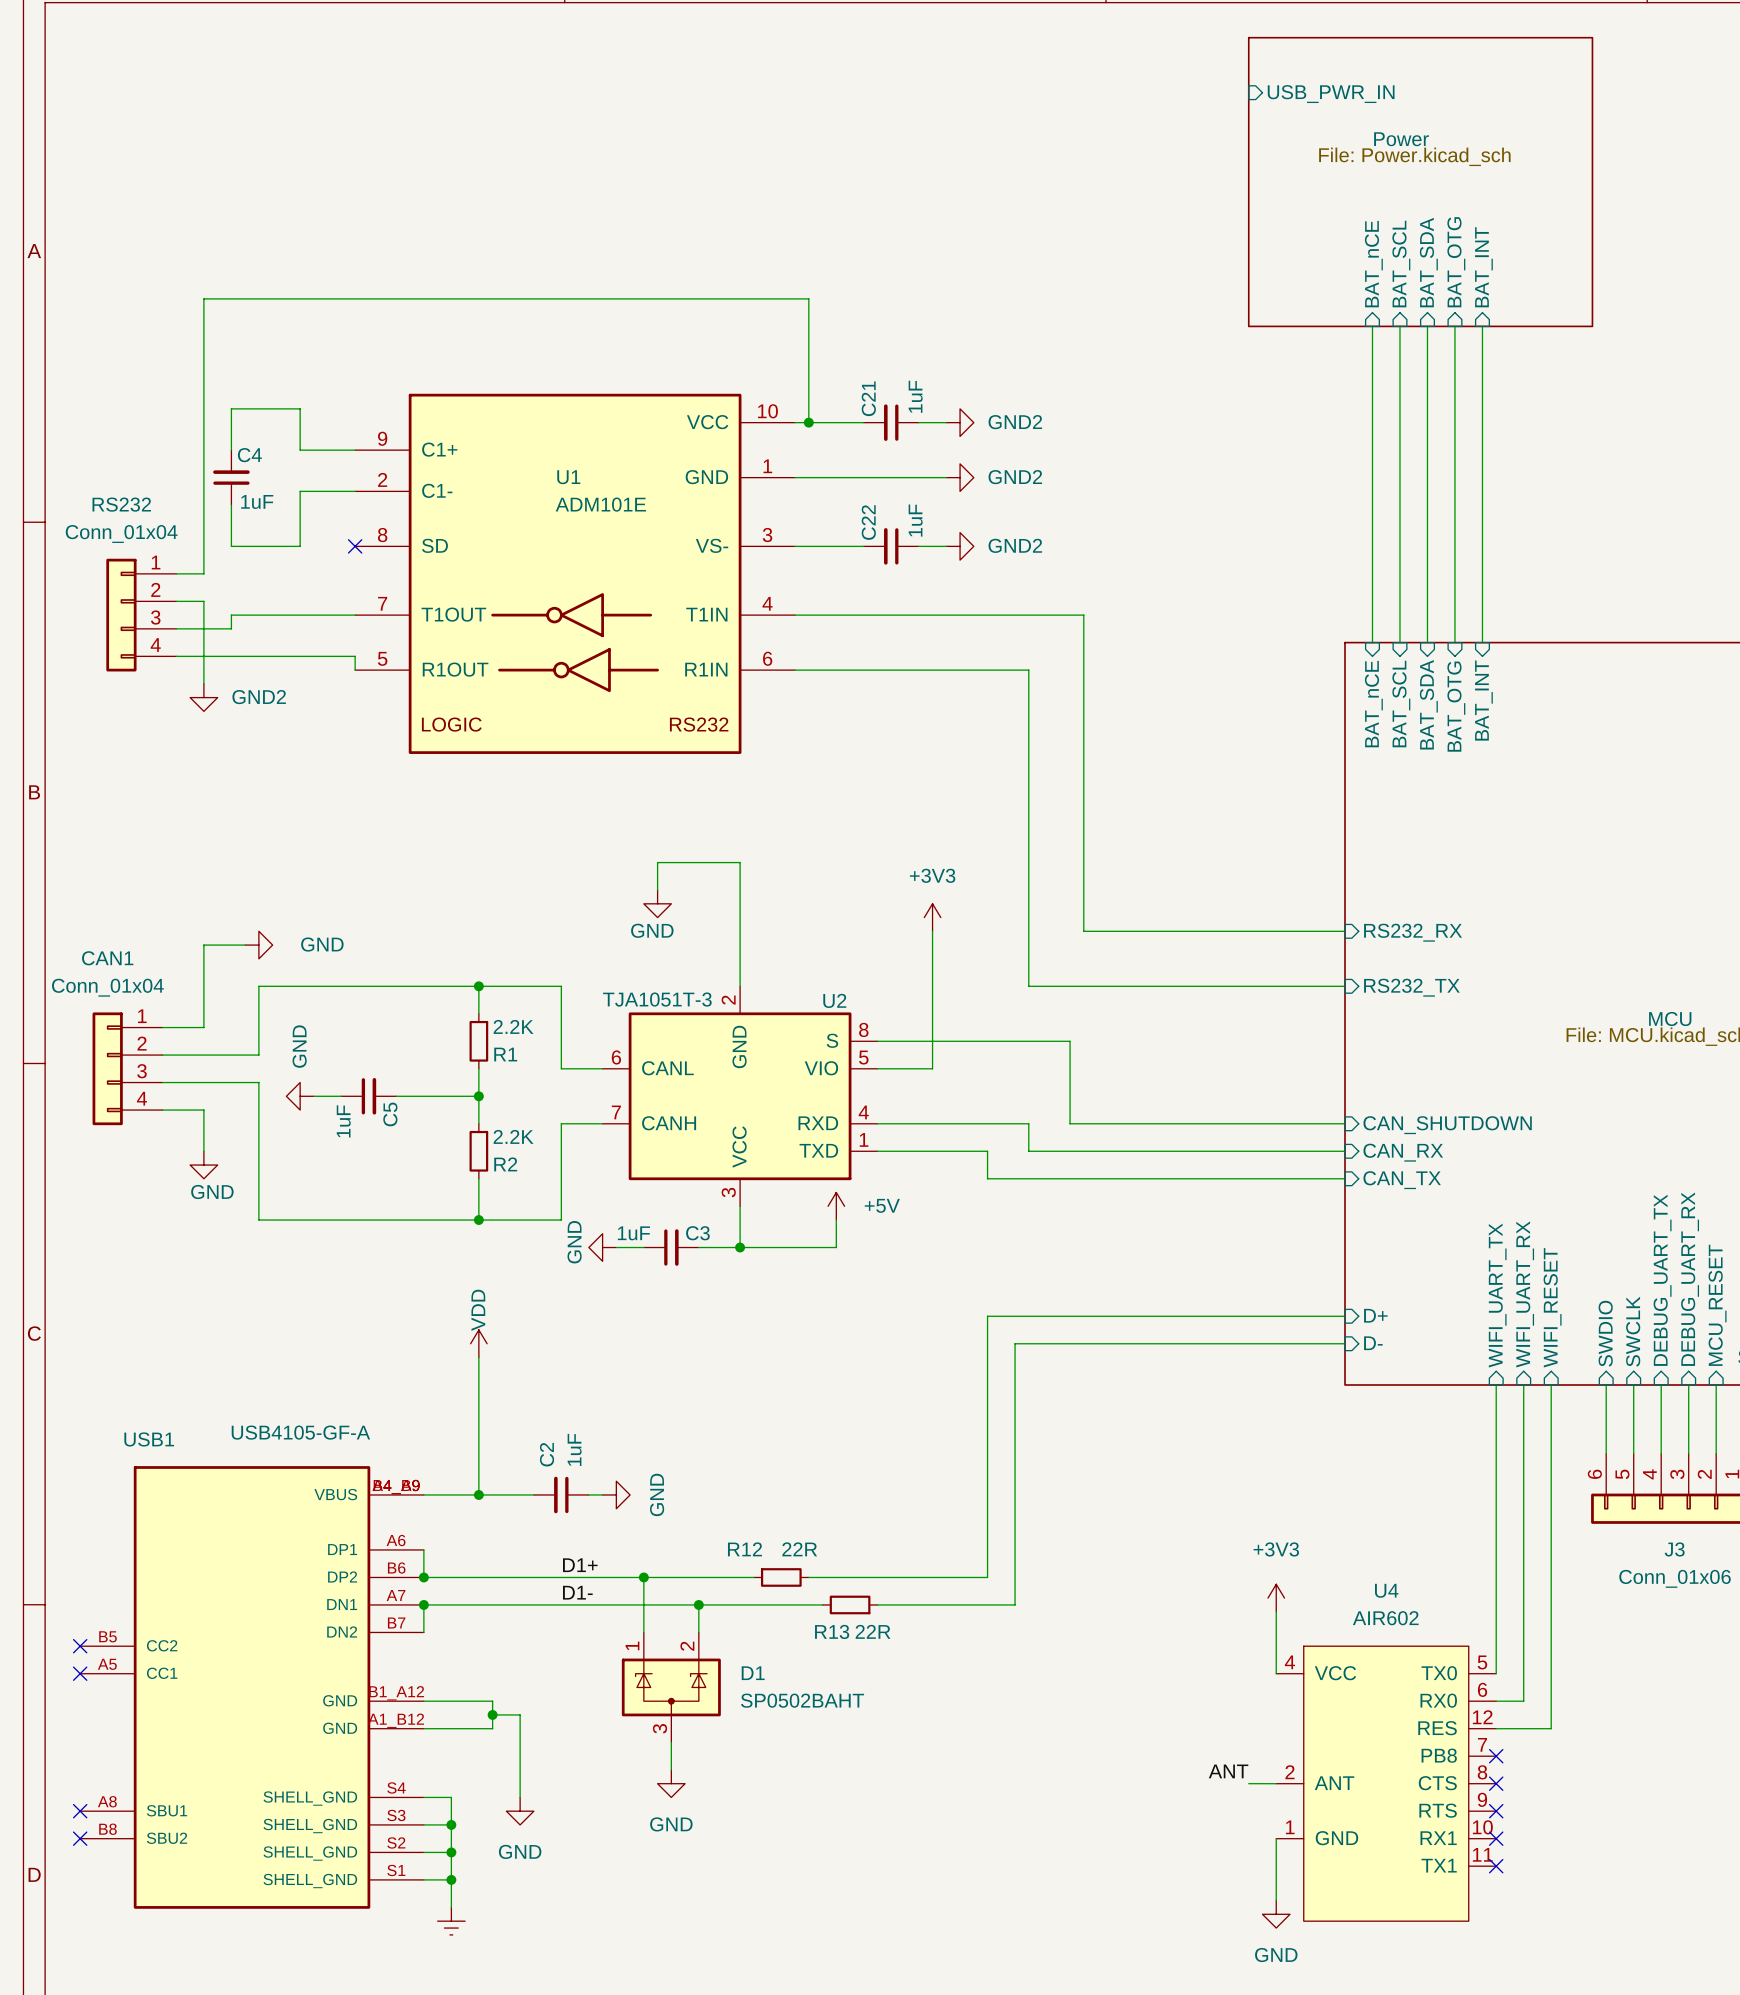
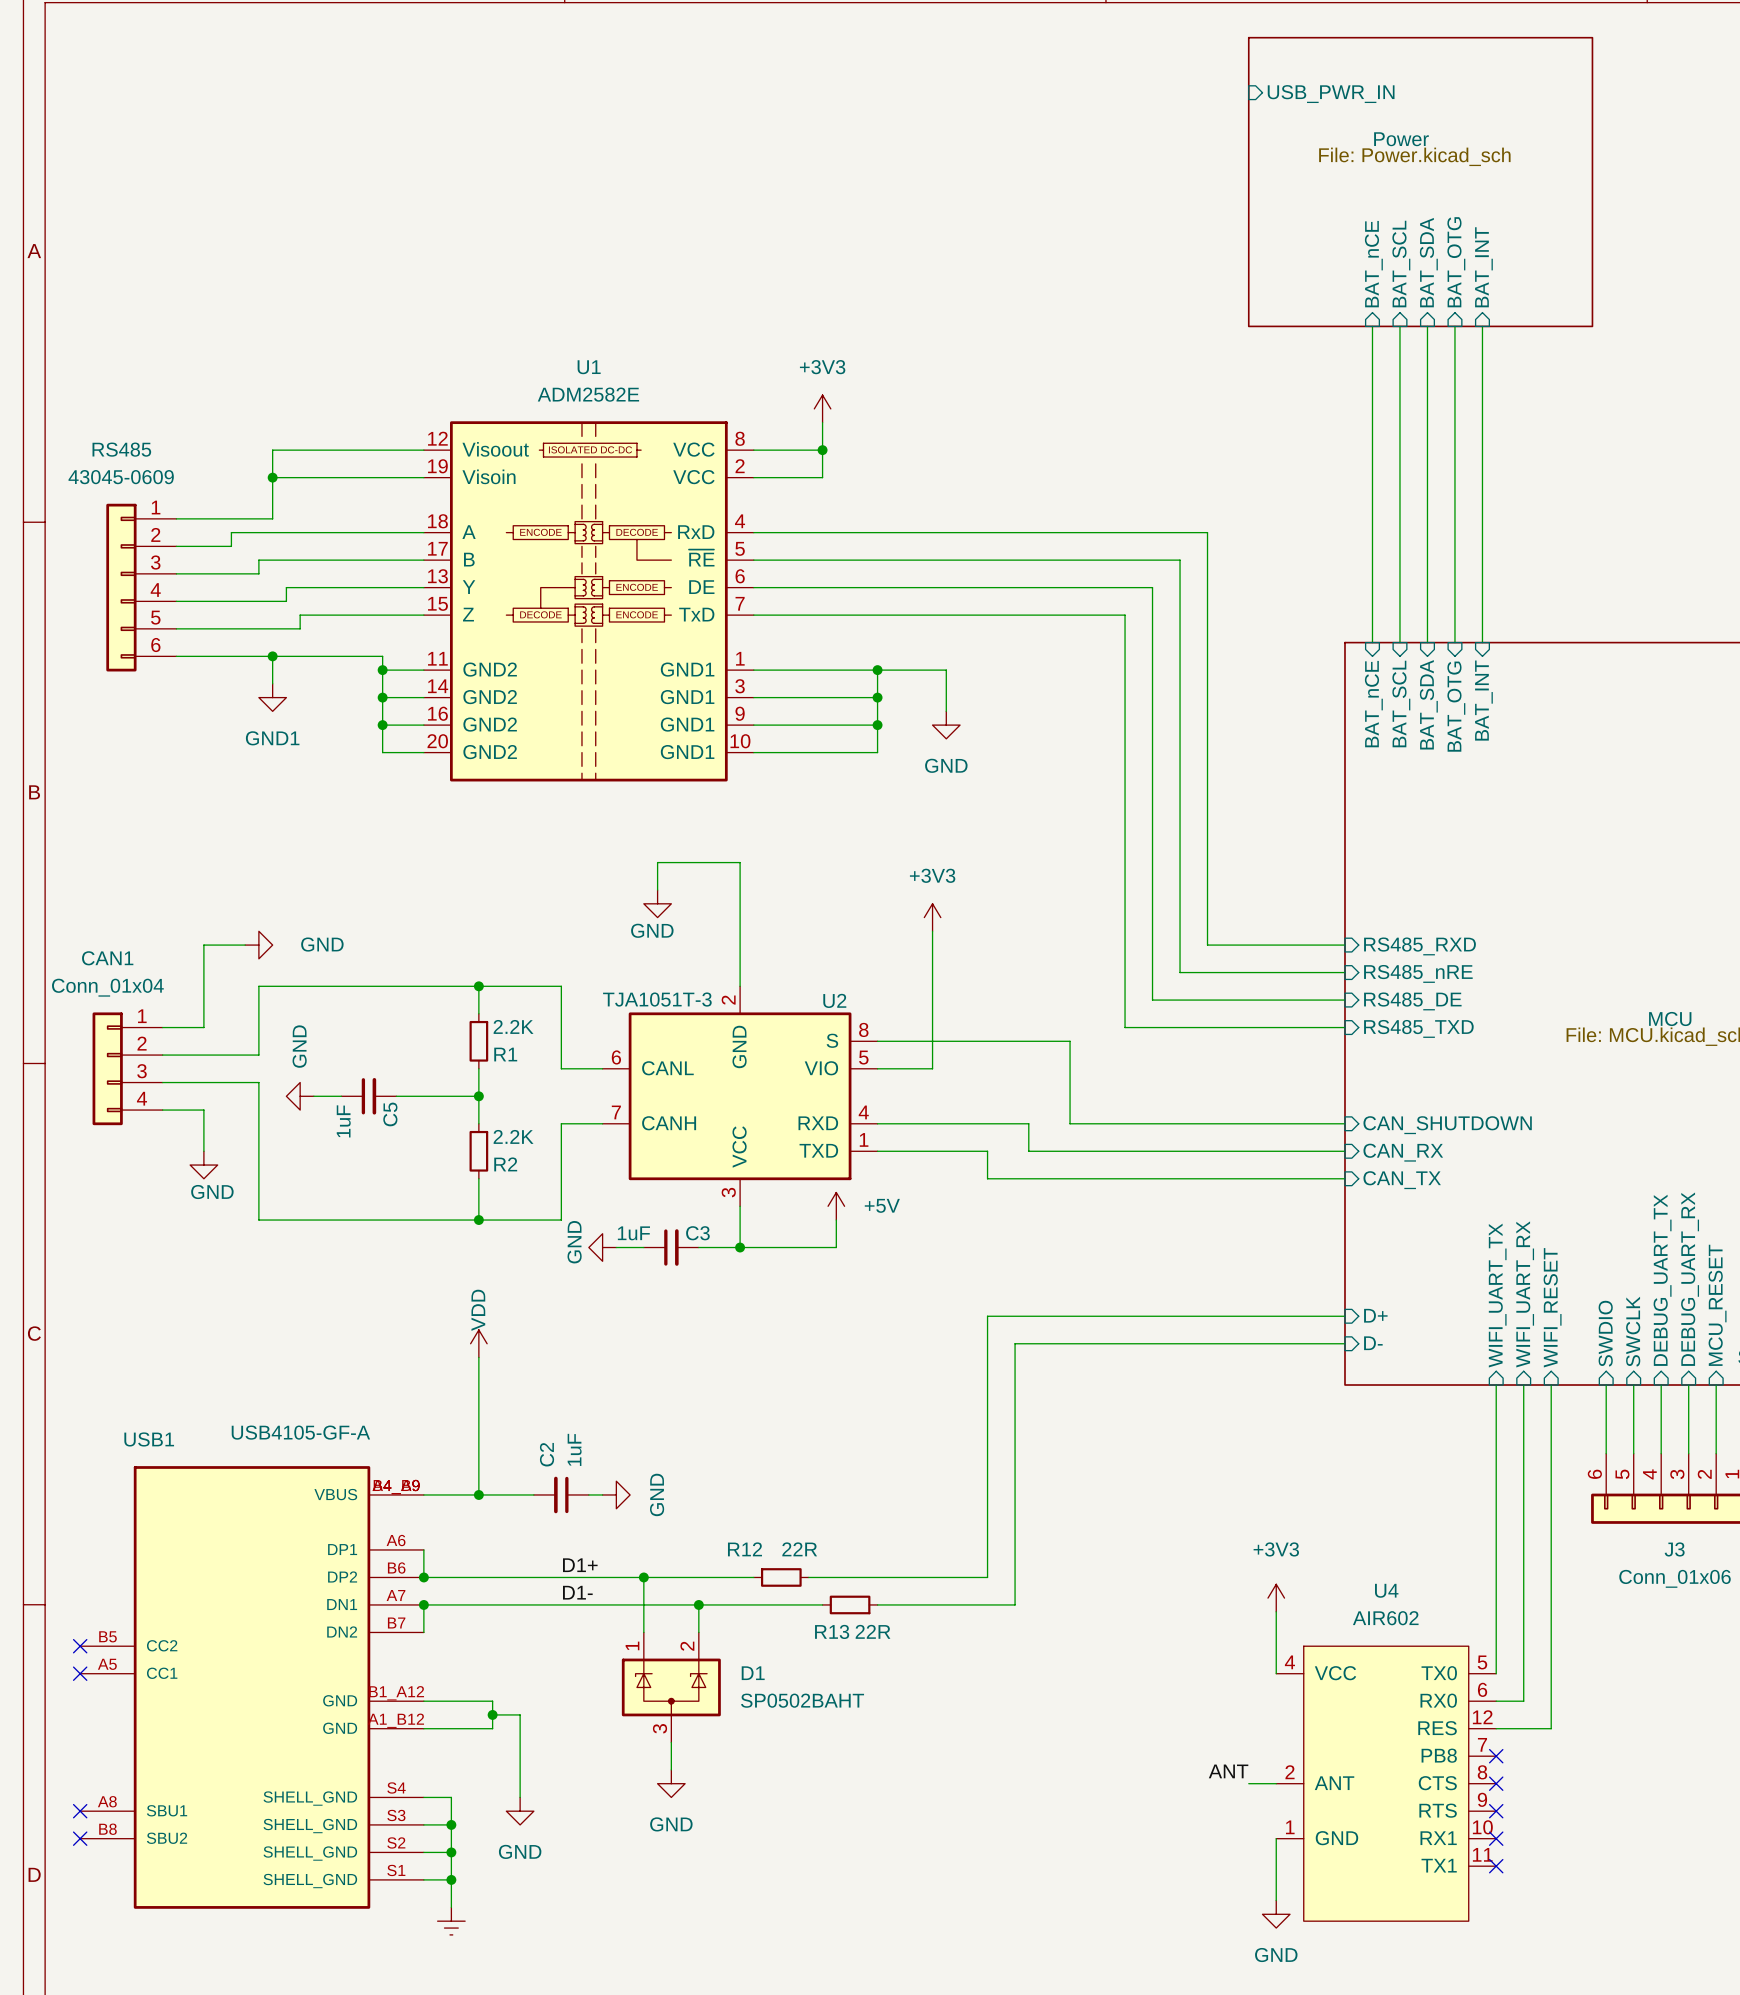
U1 symbol: [355, 393, 796, 754] -> [423, 421, 754, 782]
power symbol: none -> +3V3 (822, 408)
wire: (795, 422) (863, 422) -> (753, 450) (822, 450)
wire: (808, 422) (808, 298) (203, 298) (203, 573) -> (423, 560) (258, 560) (258, 573) (203, 573)
junction position: (808, 422) -> (822, 450)
C21: 1uF (891, 422) -> none
wire: (918, 422) (946, 422) -> none
power symbol: GND2 (960, 422) -> none
wire: (231, 450) (231, 408) (300, 408) (300, 450) -> (176, 518) (272, 518) (272, 450) (300, 450)
C4: 1uF (231, 477) -> none
wire: none -> (272, 477) (423, 477)
junction: none -> (272, 477)
U1 name position: U1 (568, 477) -> U1 (589, 367)
wire: (822, 477) (946, 477) -> (822, 477) (822, 422)
power symbol: GND2 (960, 477) -> none
wire: (355, 491) (300, 491) (300, 546) (231, 546) -> (176, 546) (231, 546)
U1 value: ADM101E (600, 504) -> ADM2582E (588, 394)
wire: (231, 505) (231, 532) -> (423, 532) (231, 532)
wire: none -> (753, 532) (1207, 532) (1207, 945) (1344, 945)
no-connect mark: (355, 546) -> none
wire: (795, 546) (863, 546) -> none
C22: 1uF (891, 546) -> none
wire: (918, 546) (946, 546) -> none
power symbol: GND2 (960, 546) -> none
wire: none -> (753, 560) (1180, 560) (1180, 972) (1344, 972)
RS485: none -> 43045-0609 (141, 587)
wire: none -> (753, 587) (1152, 587) (1152, 1000) (1344, 1000)
wire: (203, 601) (203, 683) -> (203, 601) (286, 601) (286, 587) (423, 587)
RS232: Conn_01x04 (141, 615) -> none
wire: (300, 615) (231, 615) (231, 628) -> (300, 615) (300, 628) (231, 628)
wire: (1083, 615) (1083, 931) (1344, 931) -> (1083, 615) (1125, 615) (1125, 1027) (1344, 1027)
wire: none -> (272, 656) (272, 683)
junction: none -> (272, 656)
wire: (355, 656) (355, 670) -> (355, 656) (382, 656) (382, 752) (423, 752)
junction: none -> (382, 670)
wire: none -> (877, 670) (877, 752) (753, 752)
junction: none -> (877, 670)
wire: (946, 670) (1028, 670) (1028, 986) (1344, 986) -> (946, 670) (946, 711)
power symbol: GND2 (203, 697) -> none
power symbol: none -> GND1 (272, 697)
wire: none -> (382, 697) (423, 697)
junction: none -> (382, 697)
wire: none -> (753, 697) (877, 697)
junction: none -> (877, 697)
wire: none -> (382, 725) (423, 725)
junction: none -> (382, 725)
wire: none -> (753, 725) (877, 725)
junction: none -> (877, 725)
power symbol: none -> GND (946, 725)
sheet pin: RS232_RX (1413, 932) -> none
sheet pin: none -> RS485_RXD (1420, 946)
sheet pin: none -> RS485_nRE (1418, 973)
sheet pin: RS232_TX (1411, 987) -> none
sheet pin: none -> RS485_DE (1412, 1001)
sheet pin: none -> RS485_TXD (1418, 1028)

